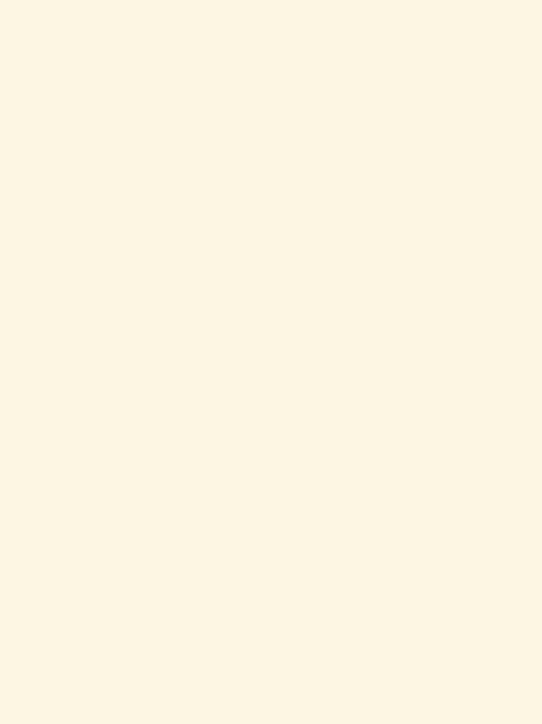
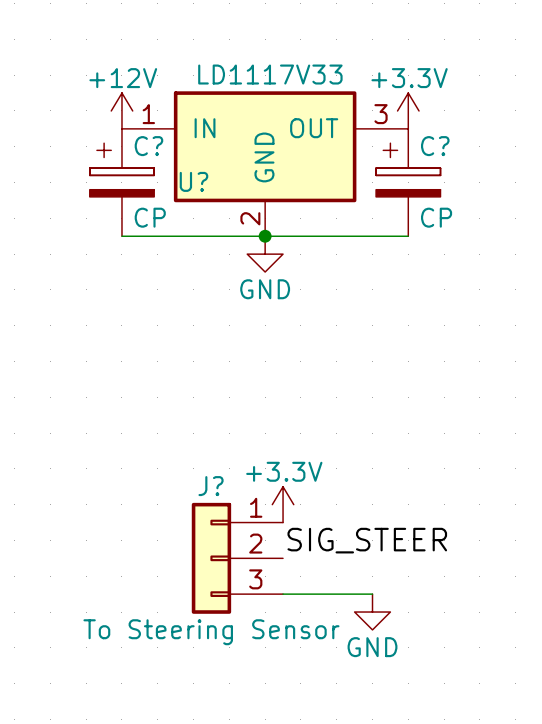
power symbol: none -> +12V (121, 110)
power symbol: none -> +3.3V (408, 110)
U?: none -> LD1117V33 (265, 163)
C?: none -> CP (121, 182)
C?: none -> CP (408, 182)
wire: none -> (121, 236) (408, 236)
junction: none -> (265, 236)
power symbol: none -> GND (265, 254)
power symbol: none -> +3.3V (283, 504)
label: none -> SIG_STEER (367, 540)
J?: none -> To Steering Sensor (237, 558)
wire: none -> (283, 594) (372, 594)
power symbol: none -> GND (372, 612)

